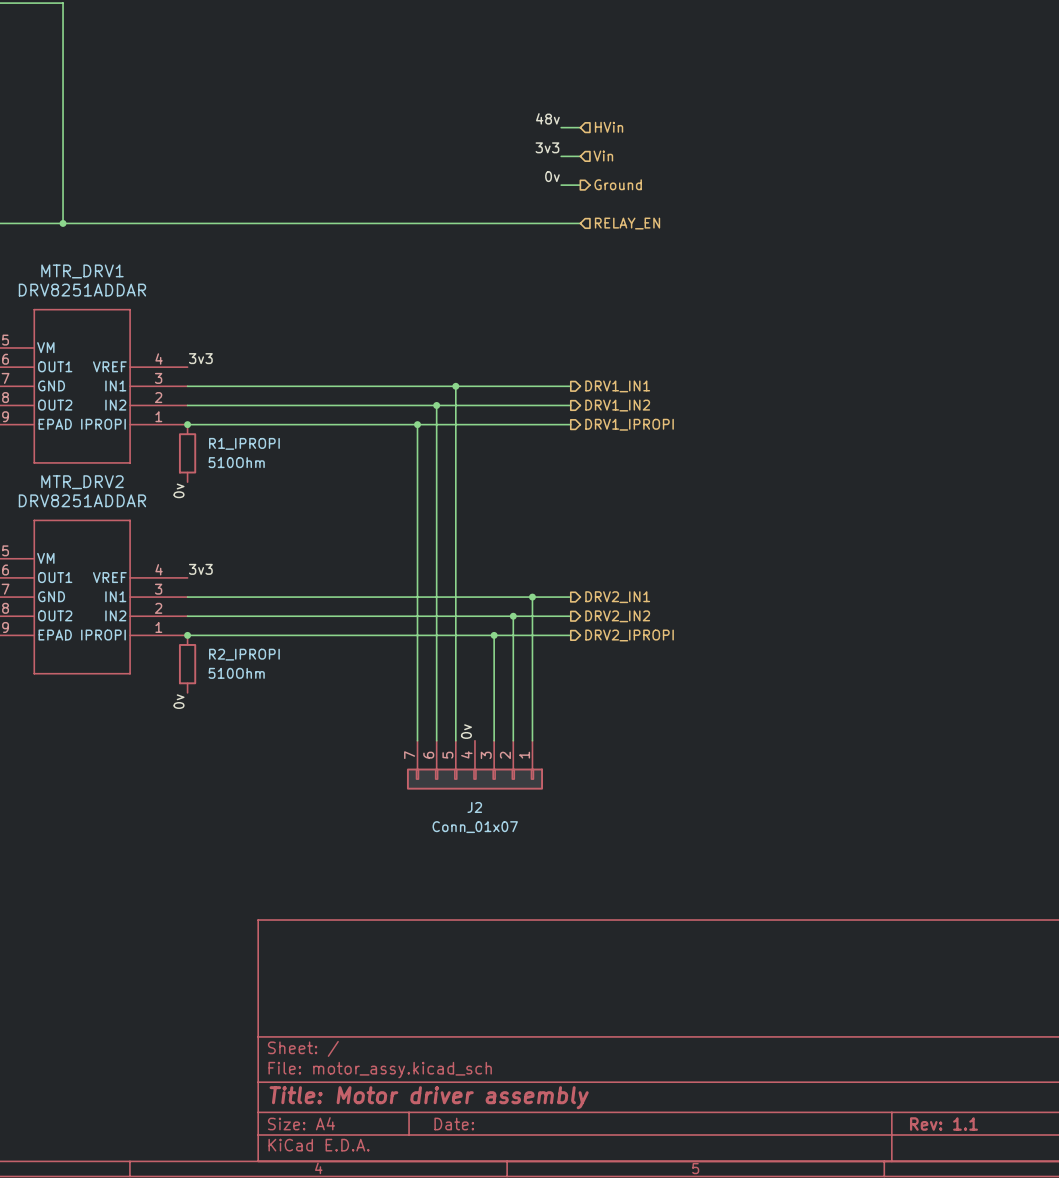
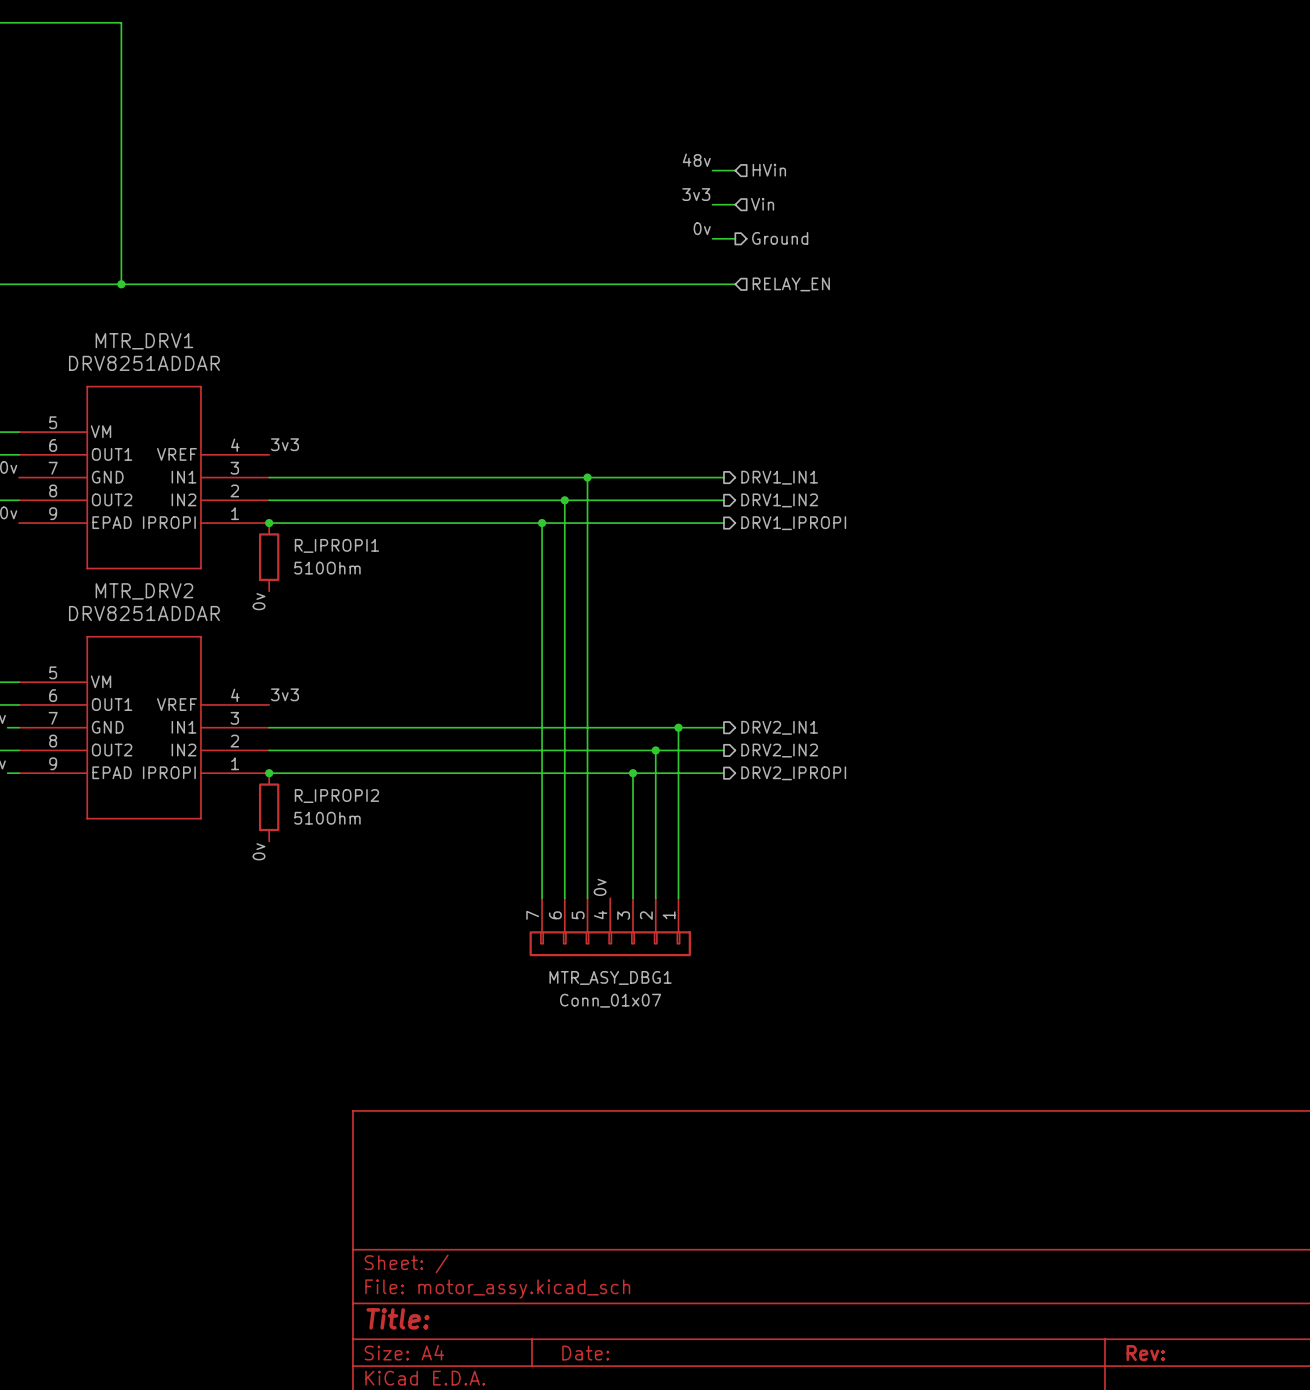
R1_IPROPI name: R1_IPROPI (244, 443) -> R_IPROPI1 (336, 545)
R2_IPROPI name: R2_IPROPI (244, 654) -> R_IPROPI2 (336, 796)
J2 name: J2 (474, 807) -> MTR_ASY_DBG1 (610, 977)
title block: Title: Motor driver assembly (429, 1097) -> Title: (398, 1318)
title block: Rev: 1.1 (943, 1124) -> Rev: (1145, 1353)

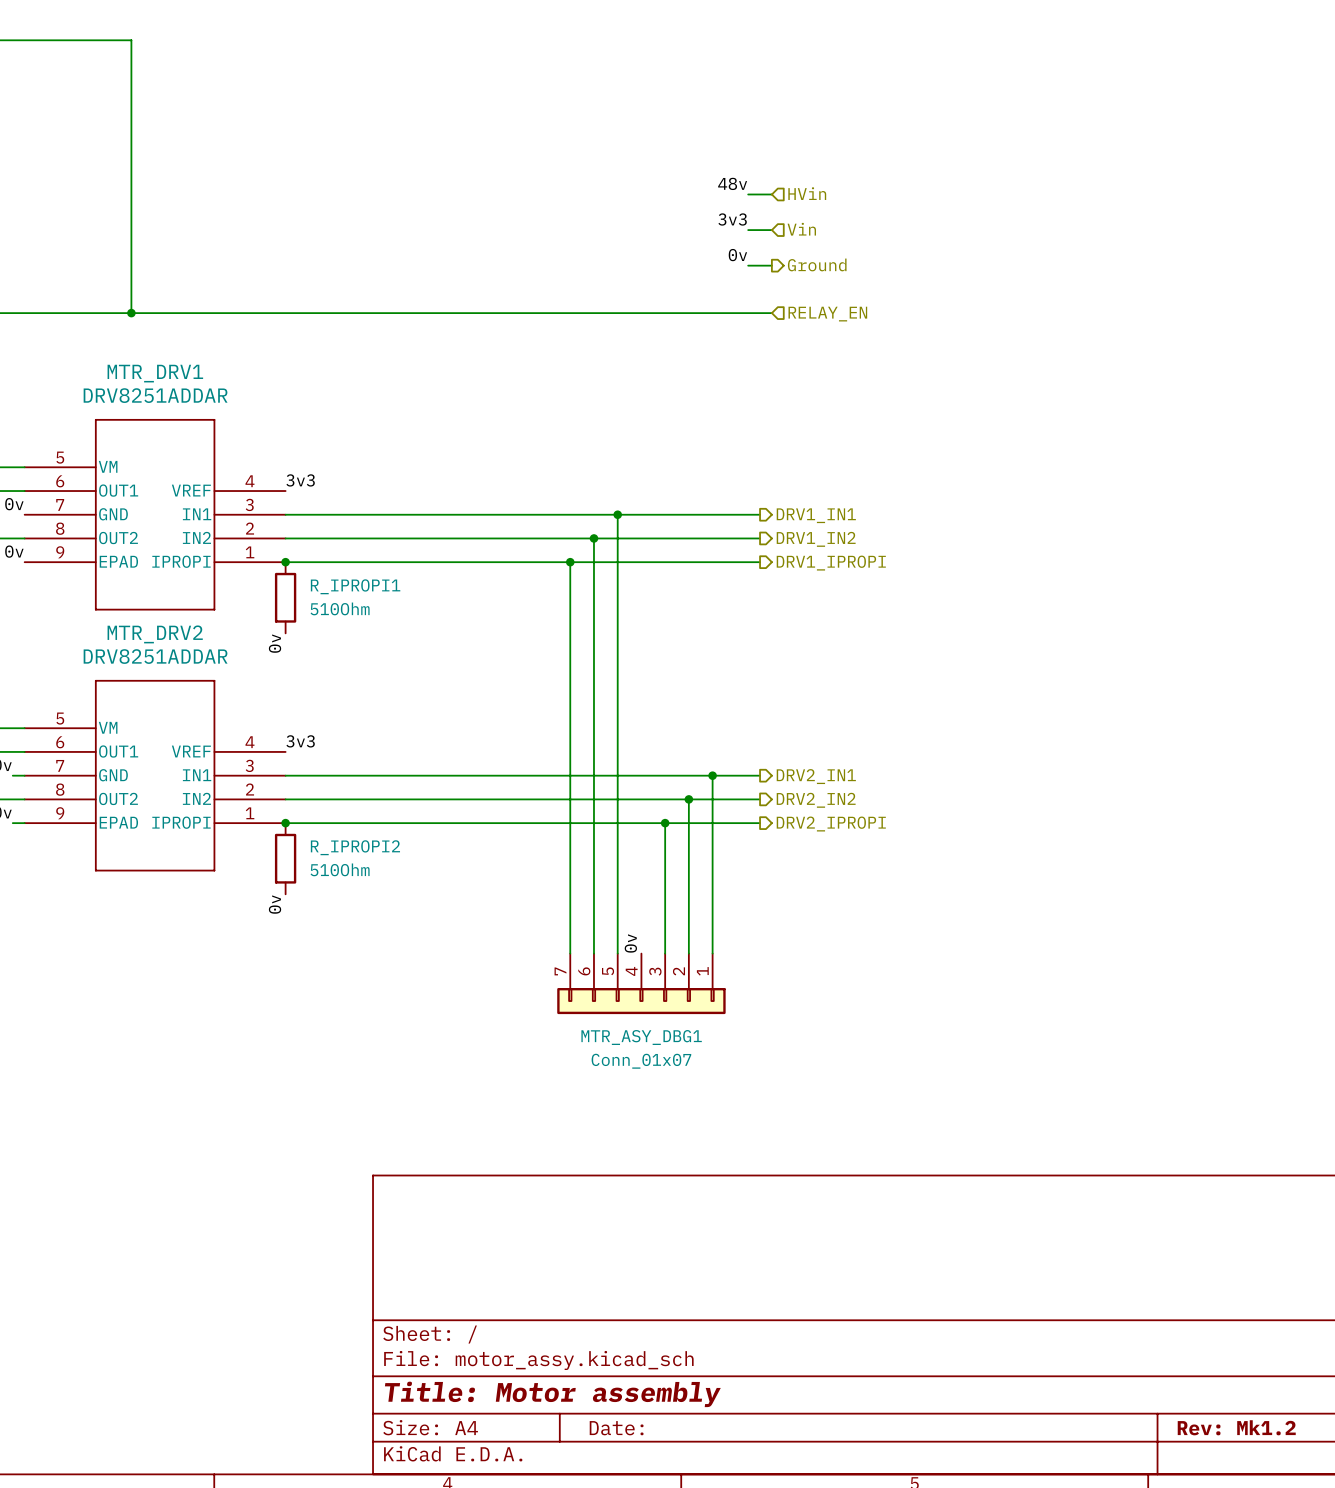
title block: Title: (398, 1318) -> Title: Motor assembly (552, 1394)
title block: Rev: (1145, 1353) -> Rev: Mk1.2 (1236, 1427)

